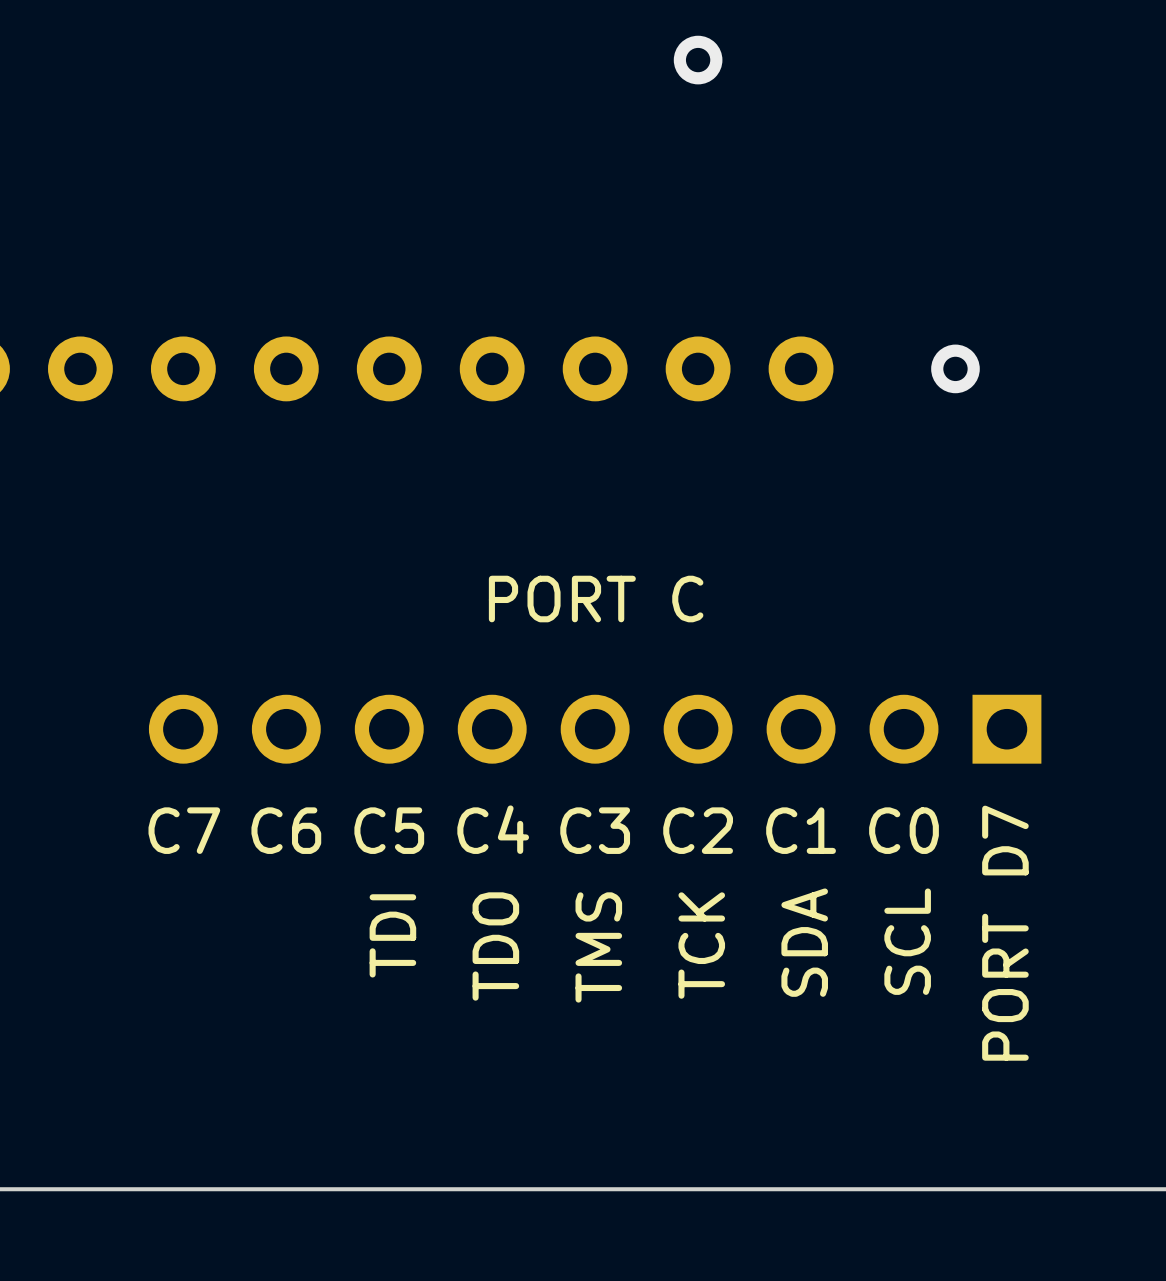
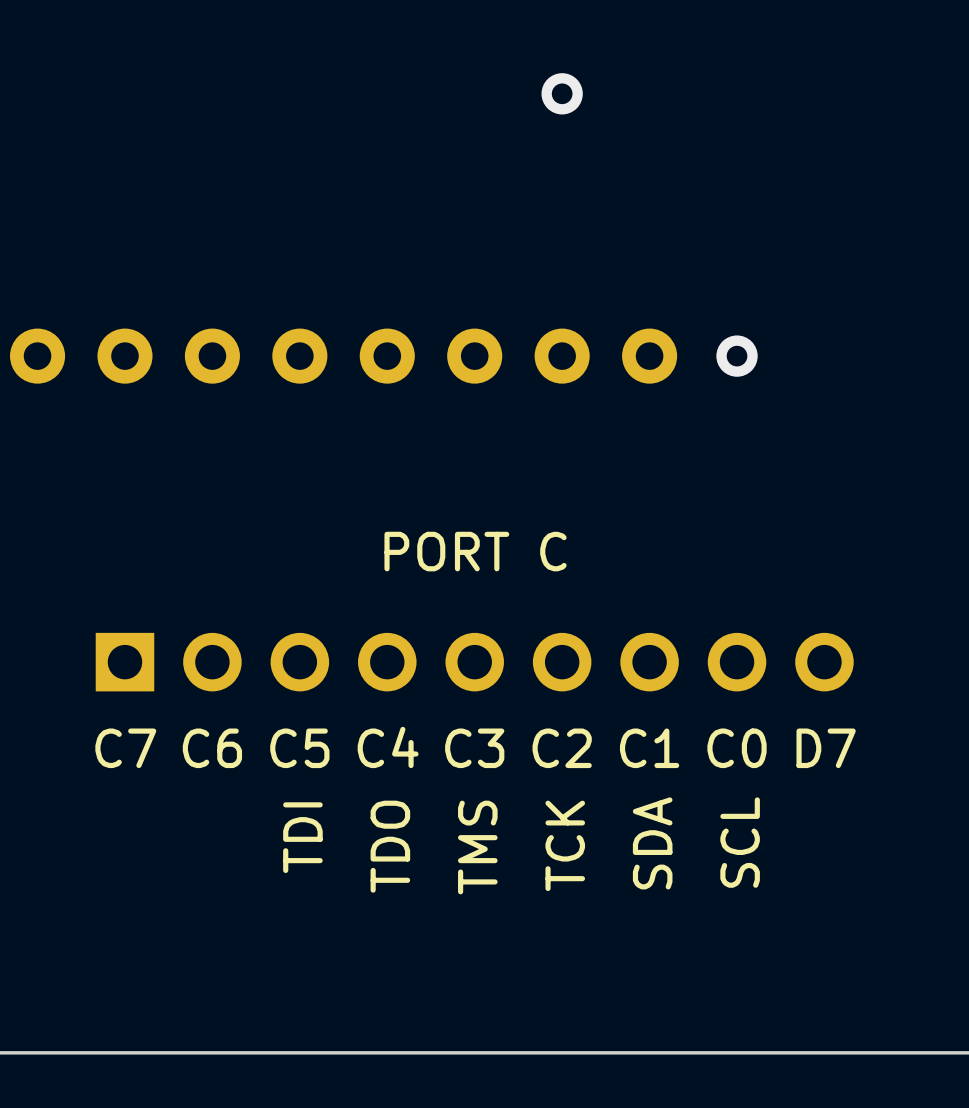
via position: (955, 368) -> (737, 356)
part rotation: 0° (595, 729) -> 180° (474, 662)
text: none -> D7 (826, 748)
text: PORT D7 (1005, 933) -> none

